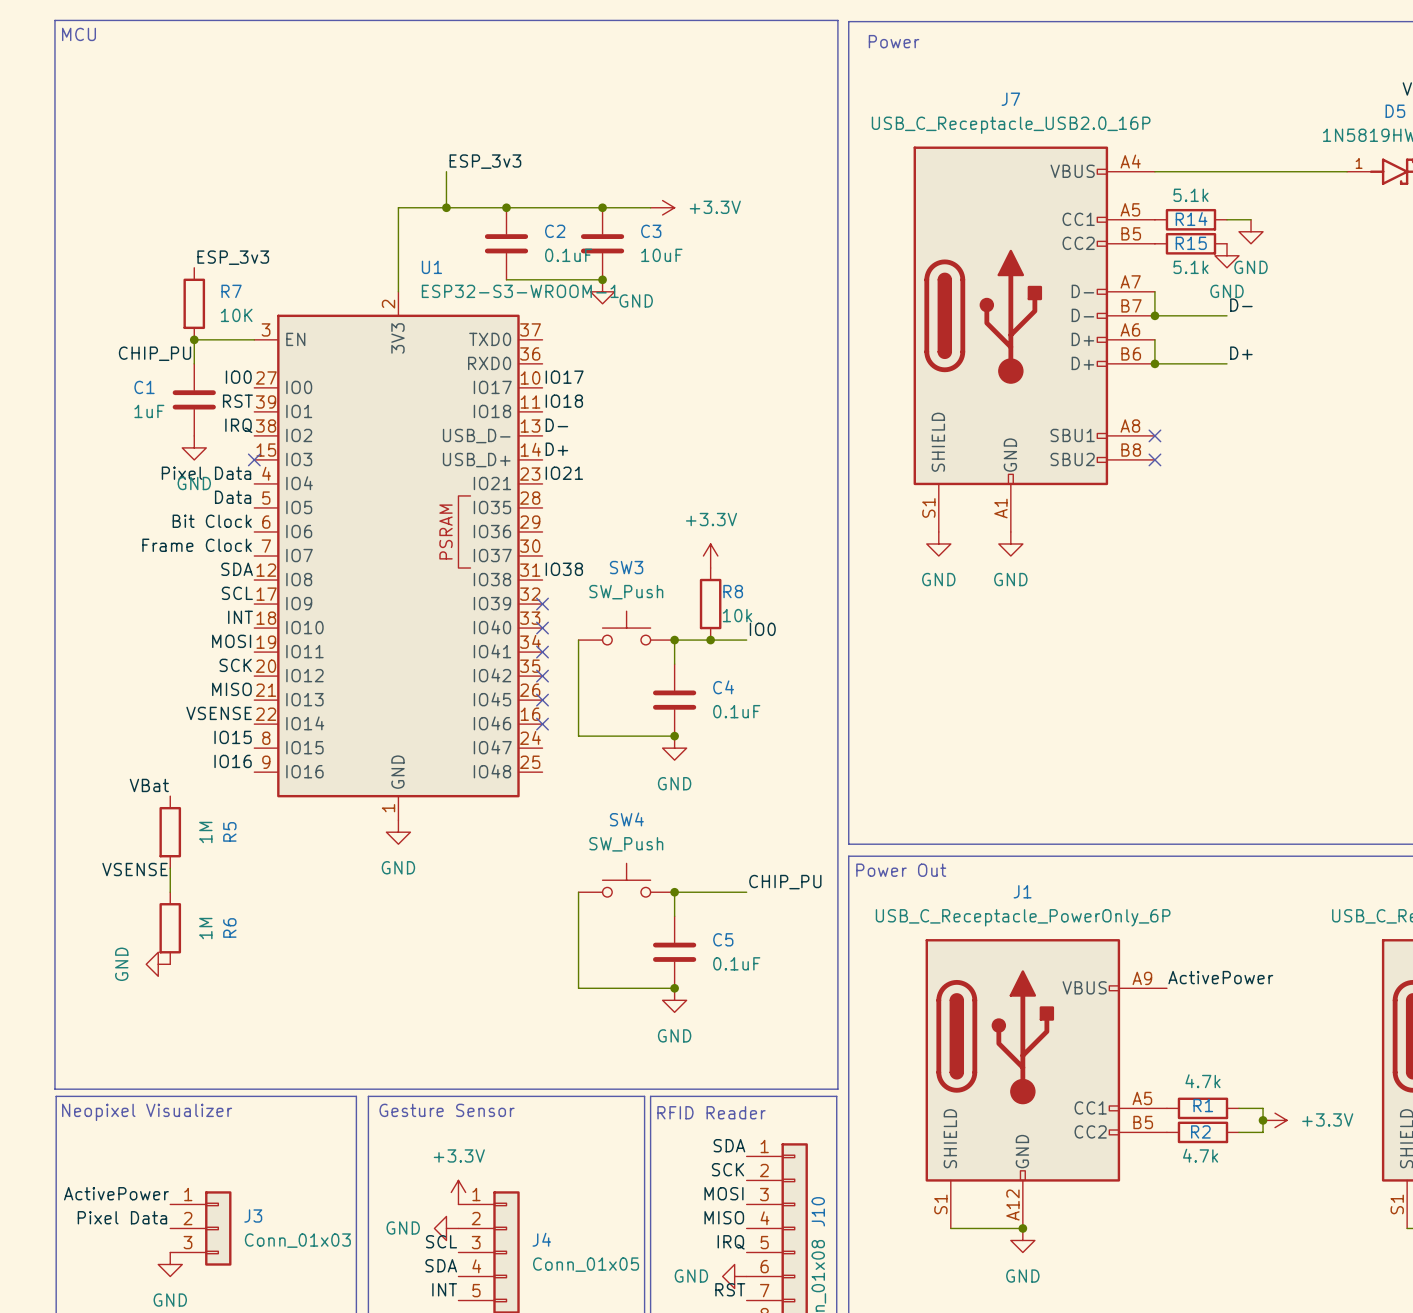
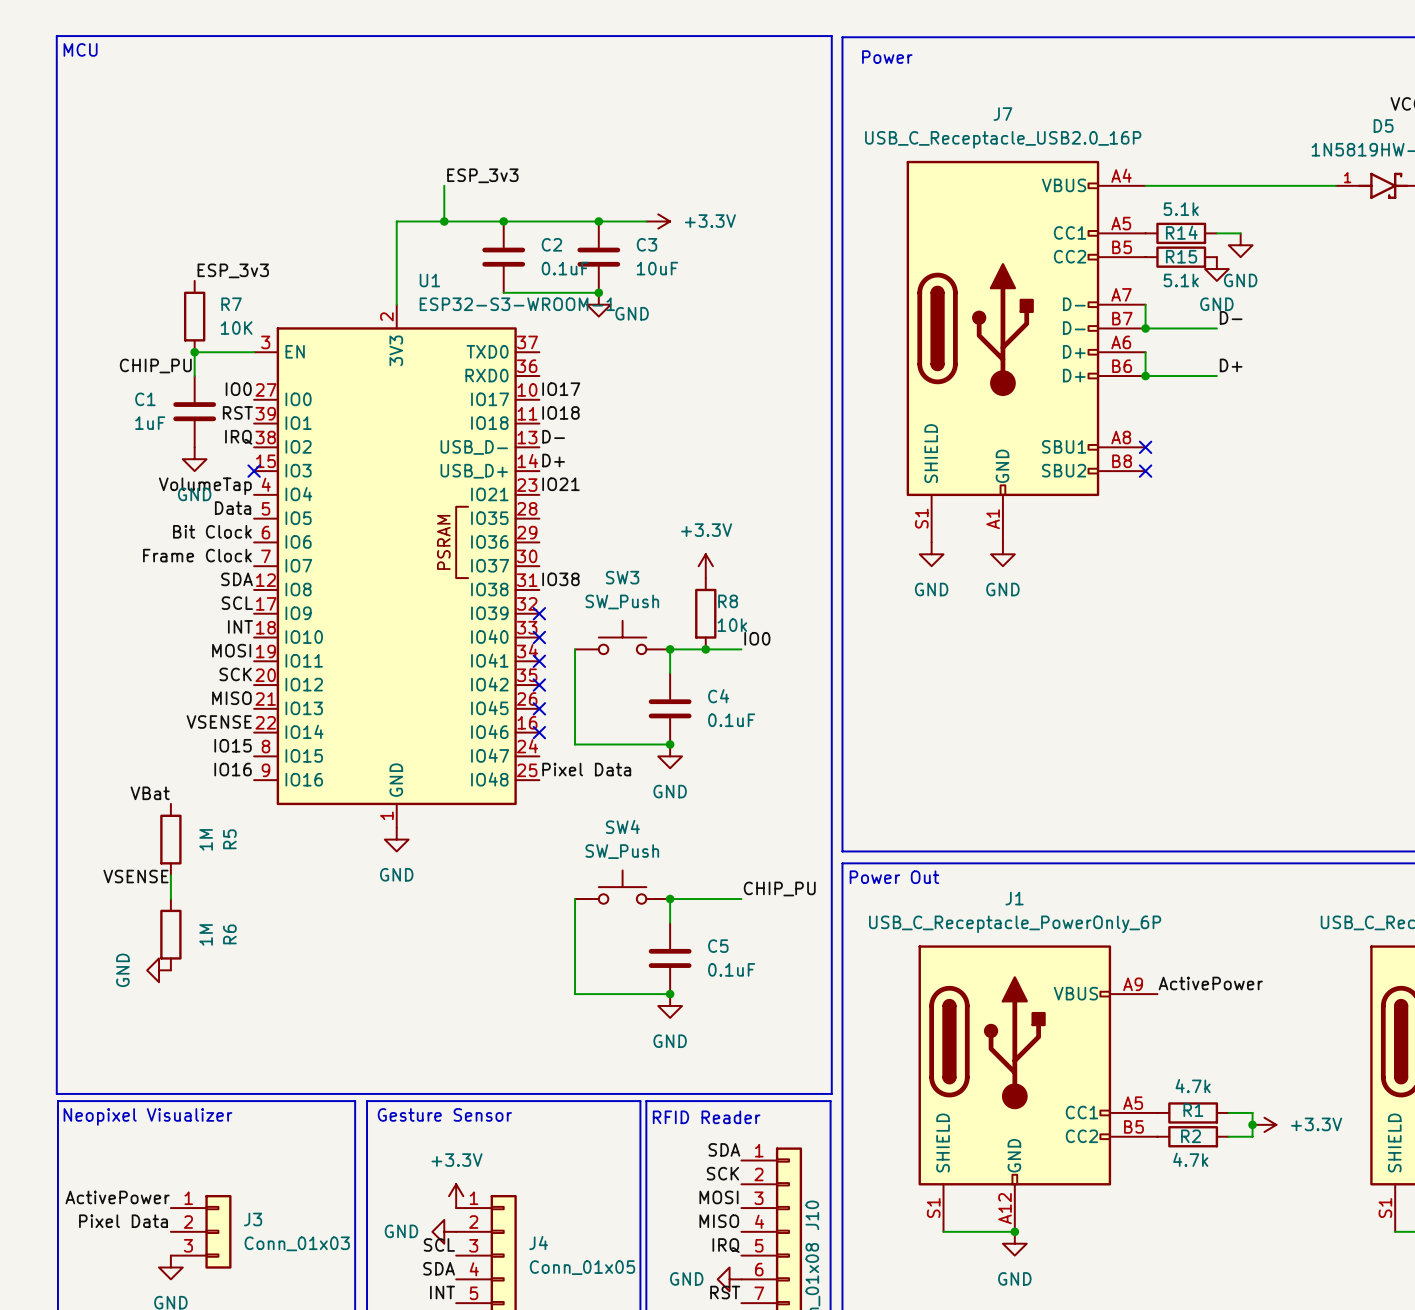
label: Pixel Data (206, 473) -> VolumeTap (205, 486)
label: none -> Pixel Data (586, 769)

